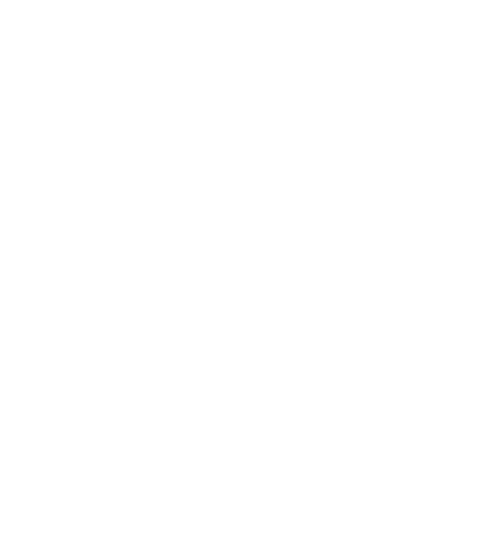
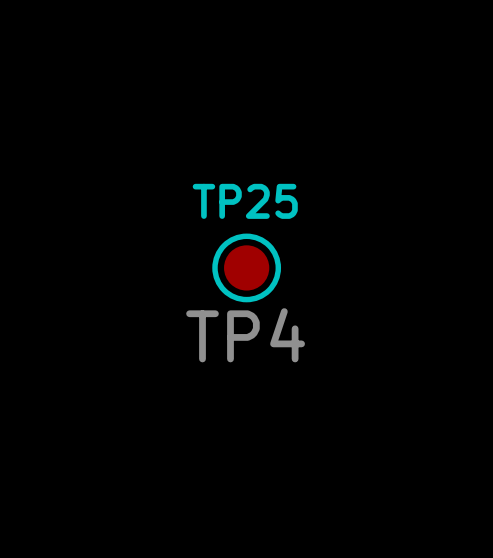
TP25: none -> TP4 (246, 267)

